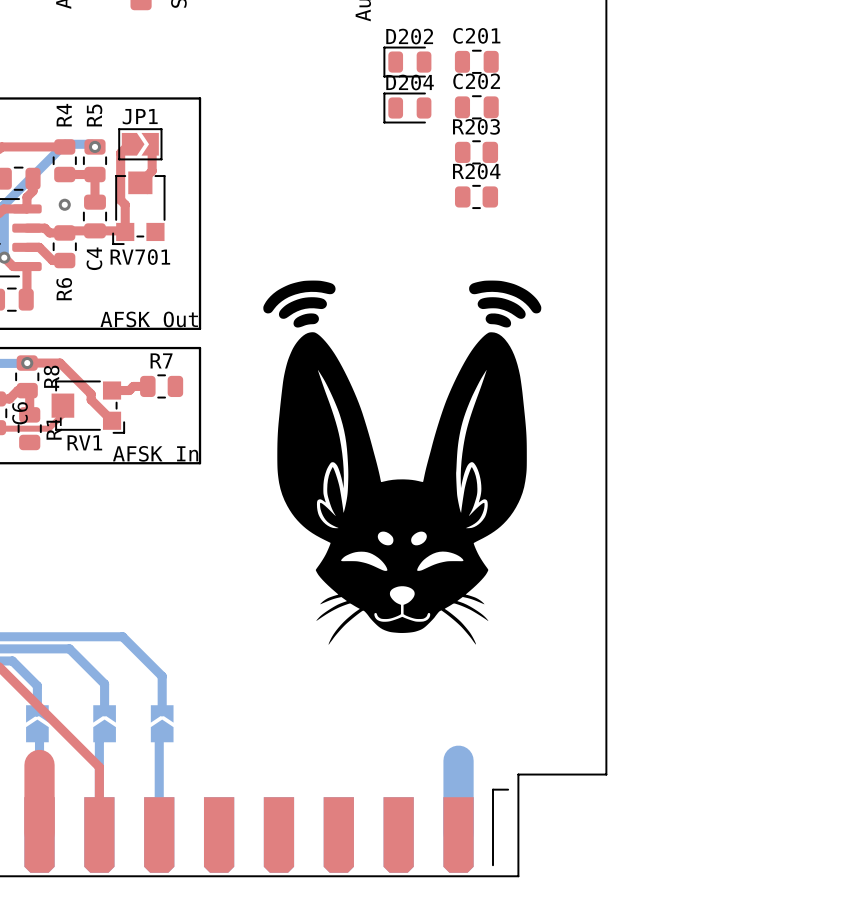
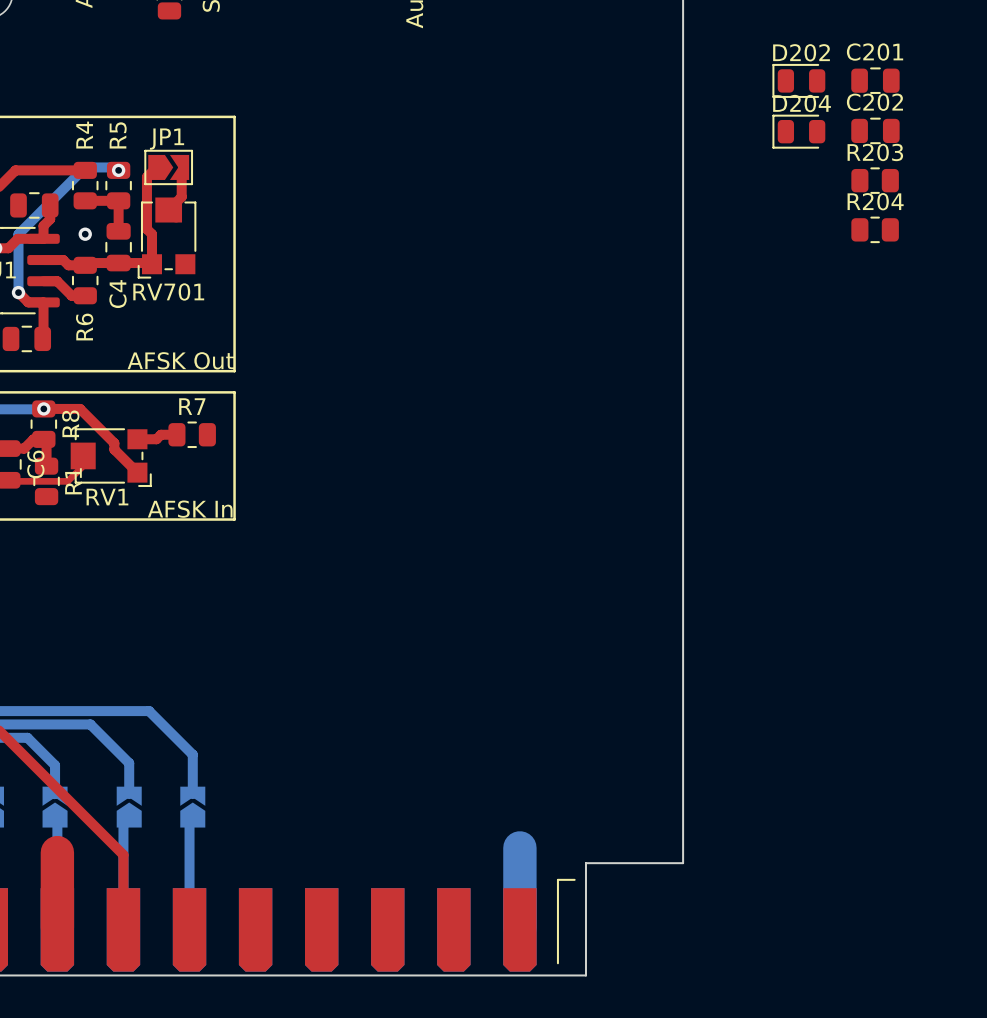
C201 position: (476, 61) -> (875, 80)
D202 position: (407, 62) -> (798, 80)
C202 position: (476, 107) -> (875, 130)
D204 position: (407, 108) -> (798, 131)
R203 position: (476, 152) -> (875, 180)
R204 position: (476, 196) -> (875, 229)
drawing: [263, 280, 542, 645] -> none

